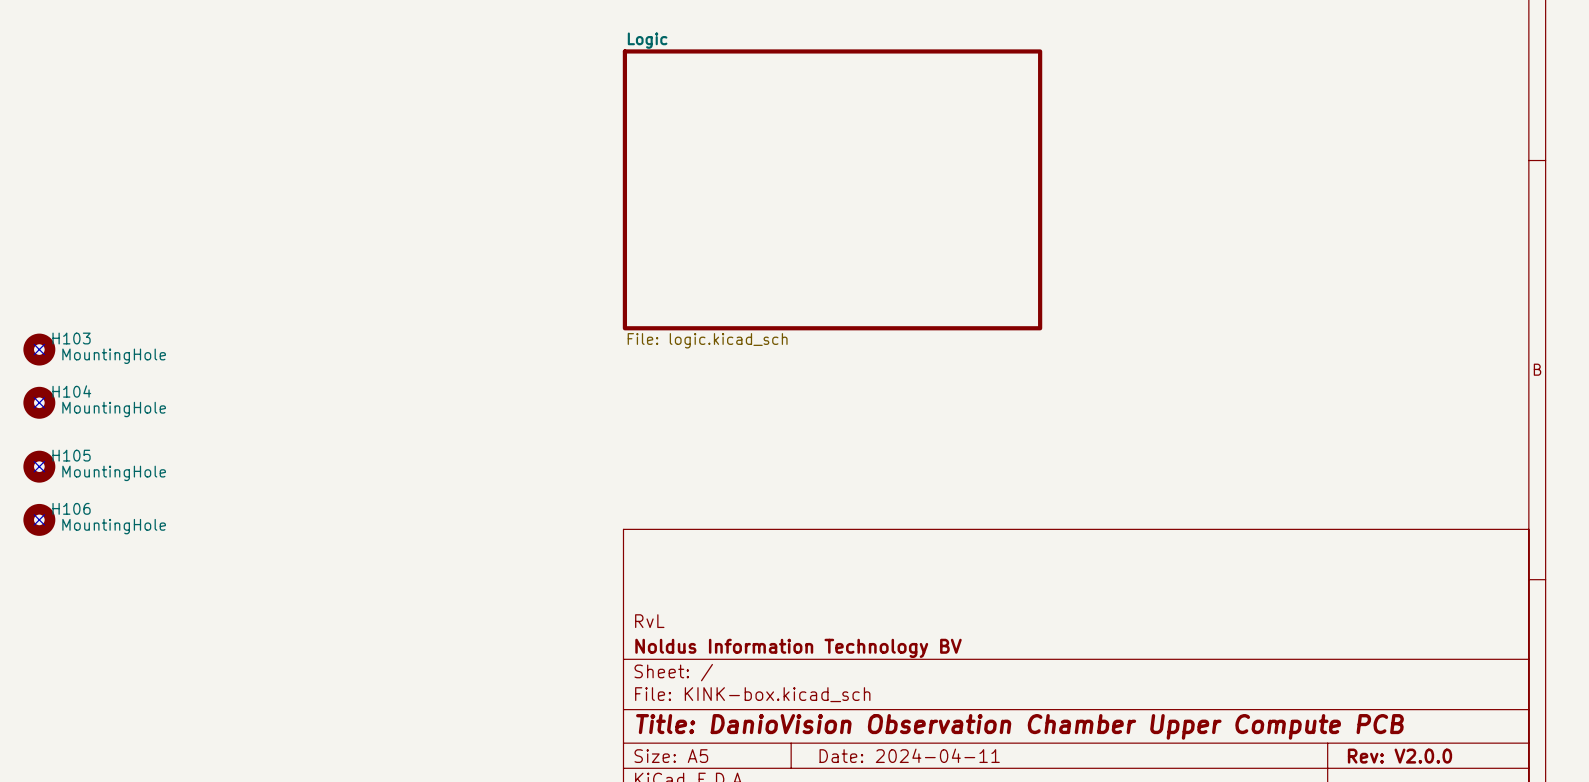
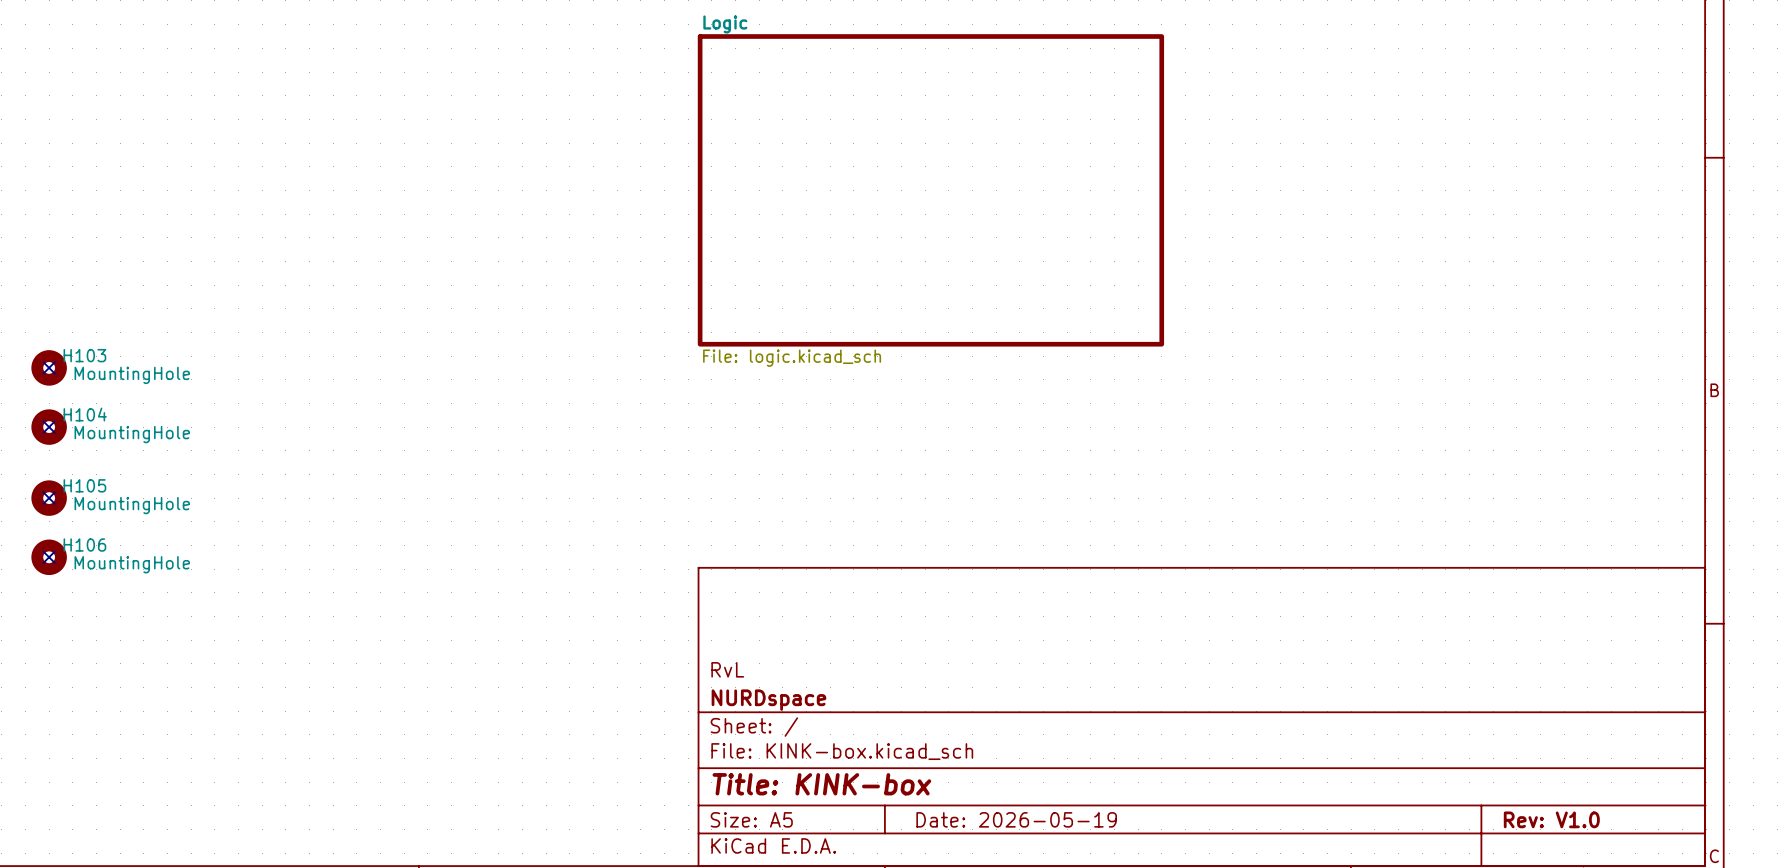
title block: Noldus Information Technology BV (798, 648) -> NURDspace (768, 700)
title block: Title: DanioVision Observation Chamber Upper Compute PCB (1020, 726) -> Title: KINK-box (821, 784)
title block: Date: 2024-04-11 (909, 755) -> Date: 2026-05-19 (1016, 819)
title block: Rev: V2.0.0 (1399, 756) -> Rev: V1.0 (1551, 819)

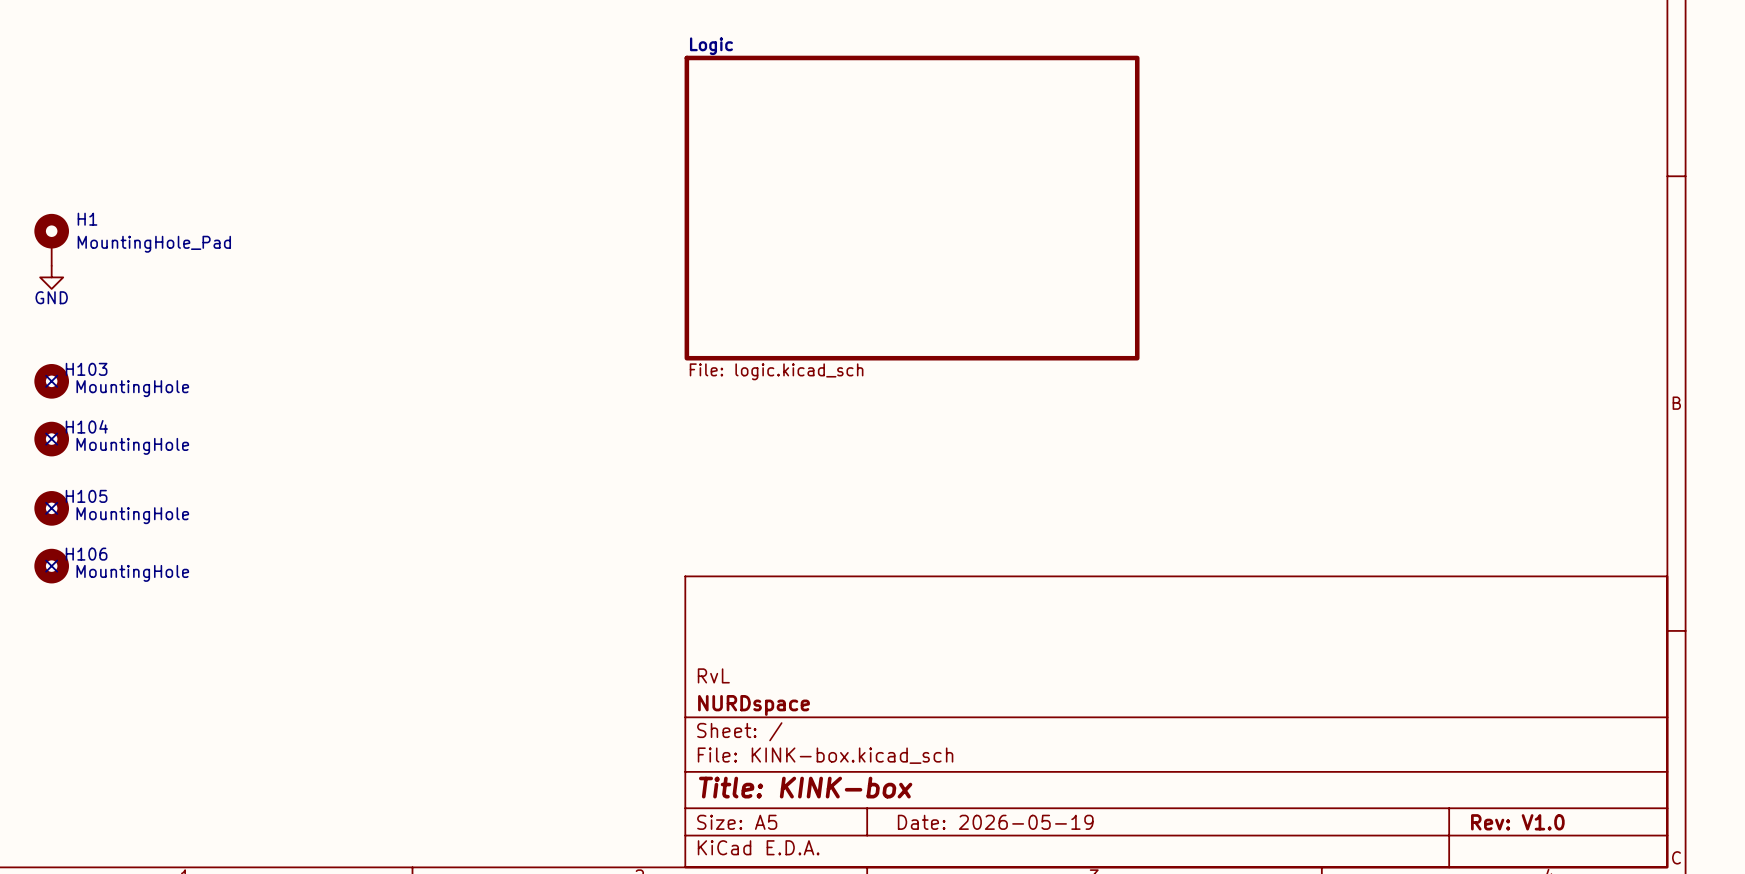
H1: none -> MountingHole_Pad (51, 239)
power symbol: none -> GND (51, 277)

